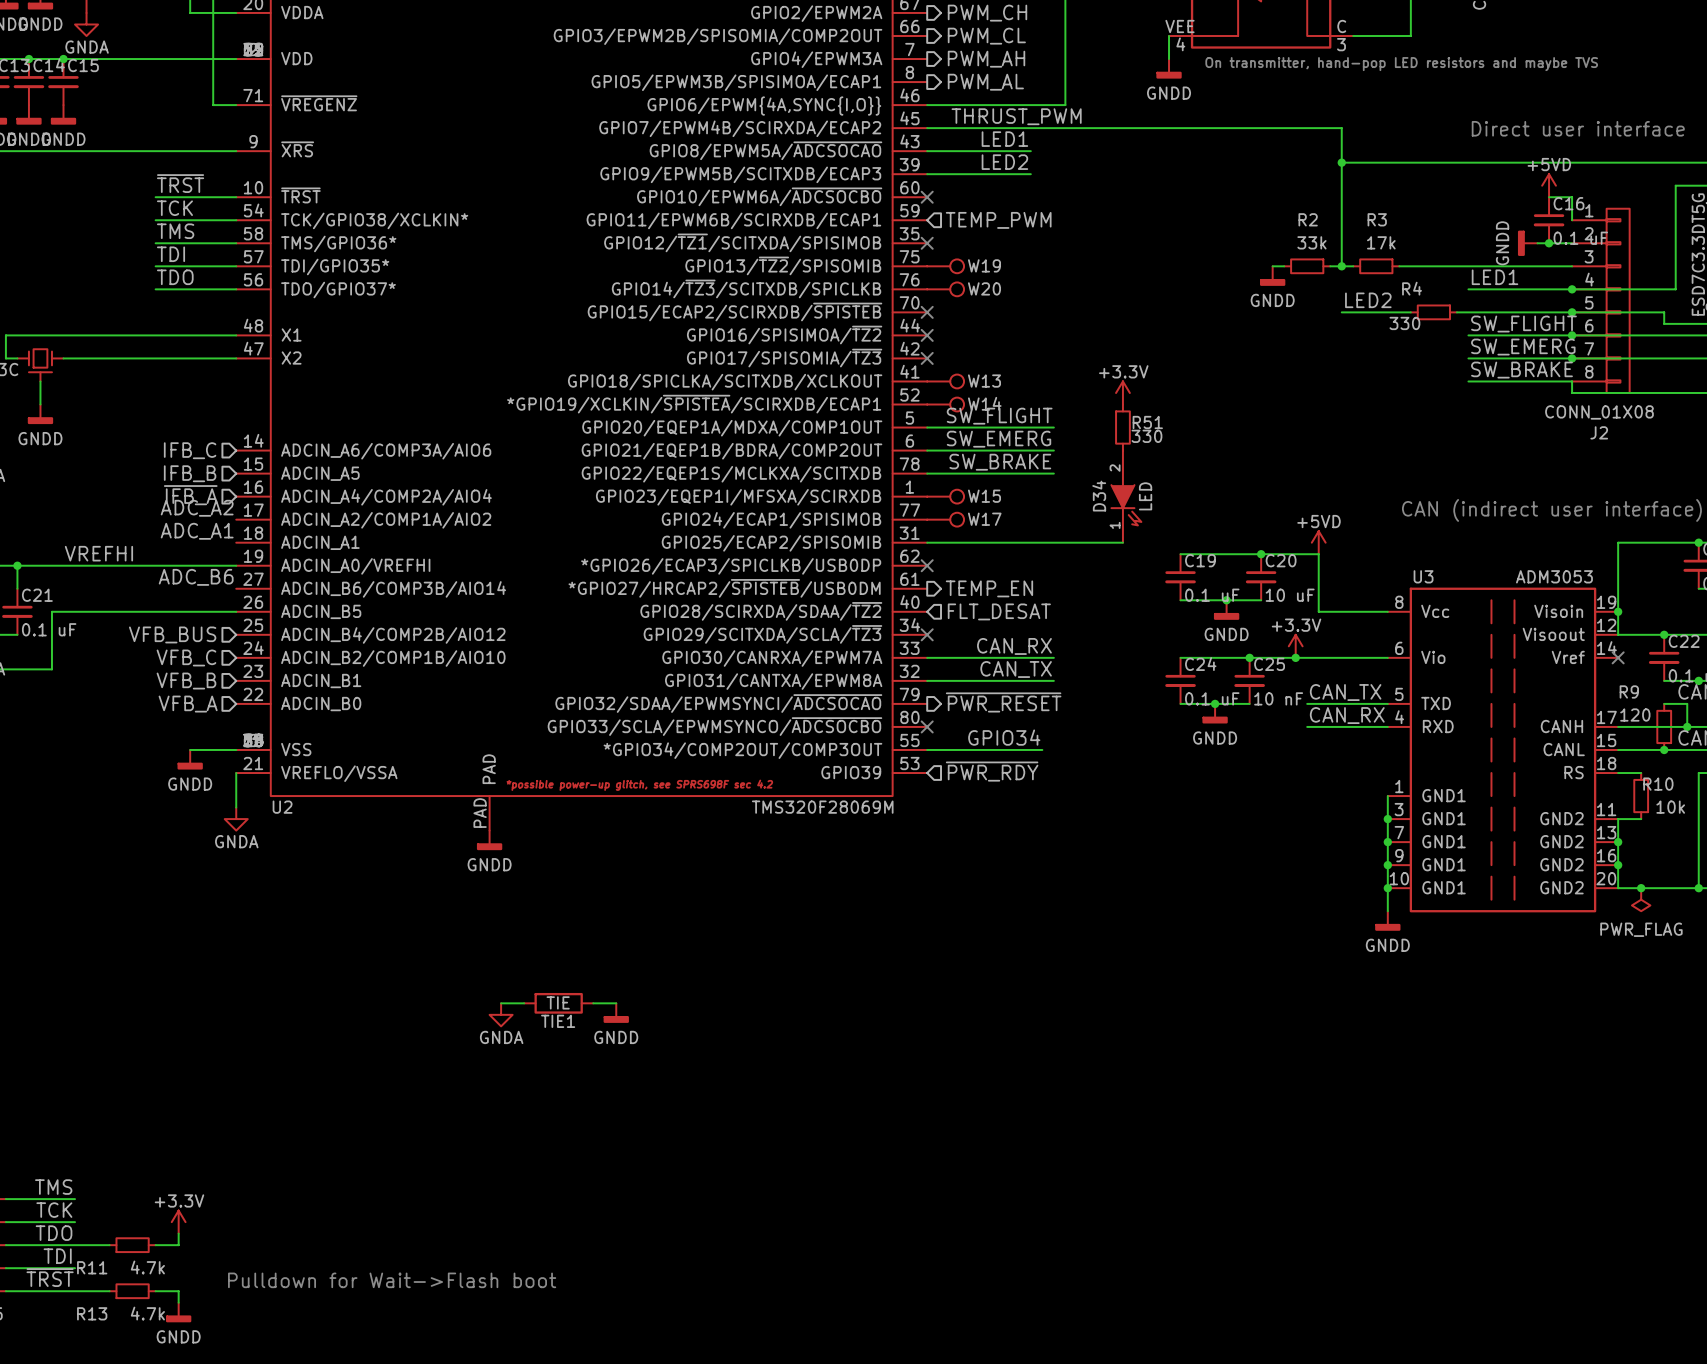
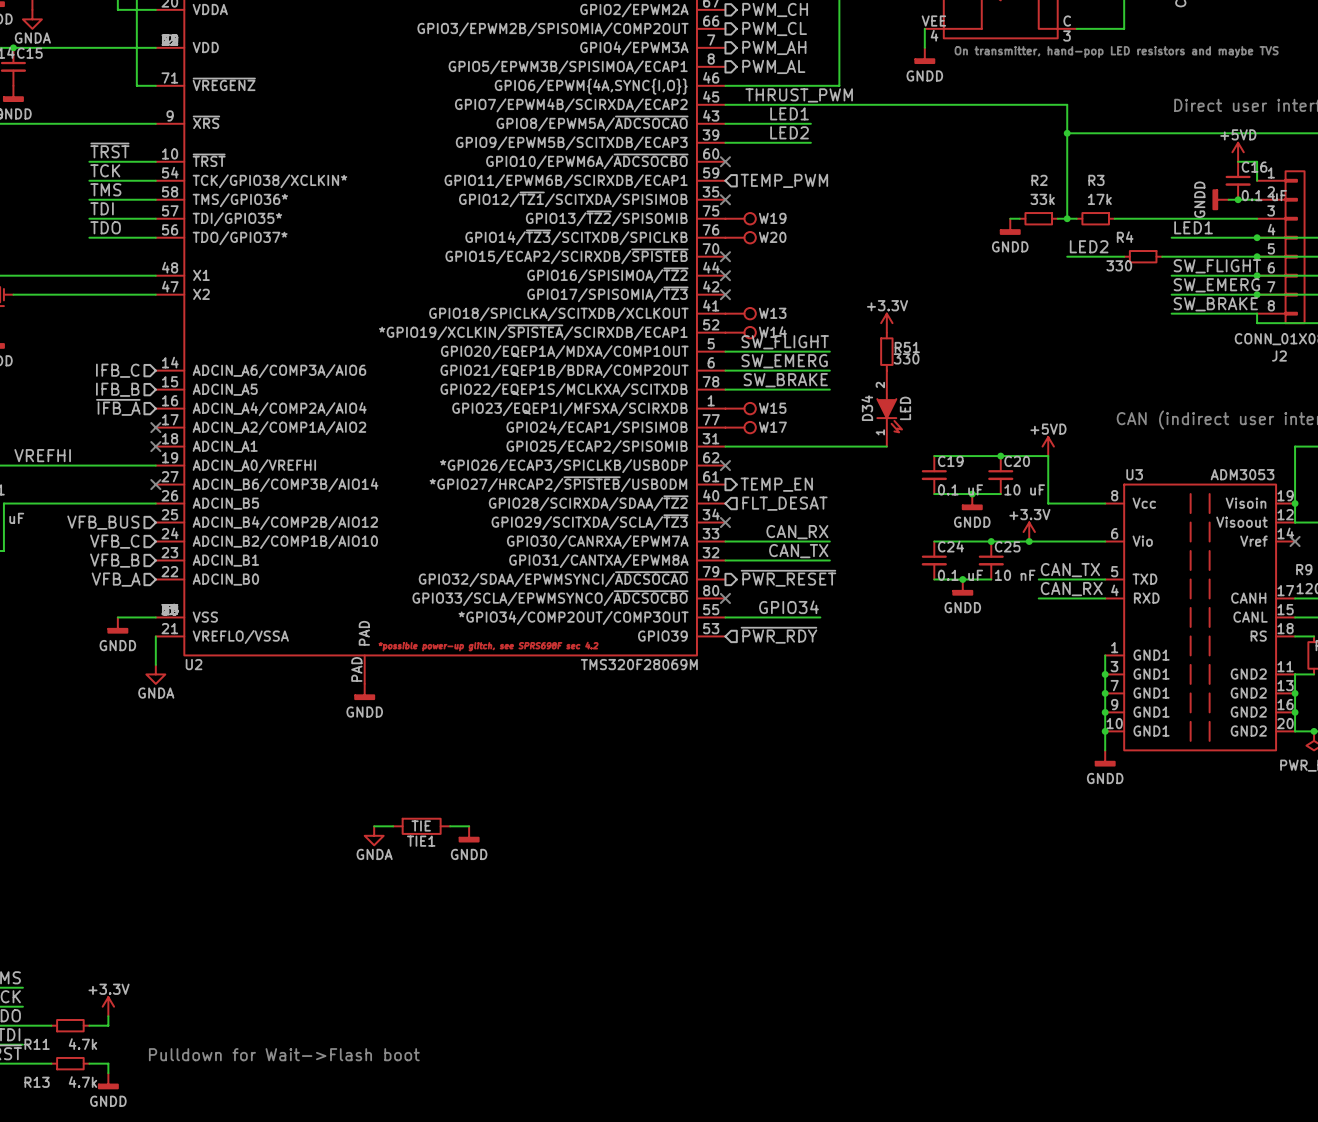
label: ADC_A2 (197, 508) -> none
no-connect mark: none -> (155, 427)
label: ADC_A1 (197, 531) -> none
no-connect mark: none -> (155, 446)
label: ADC_B6 (196, 577) -> none
no-connect mark: none -> (155, 484)

